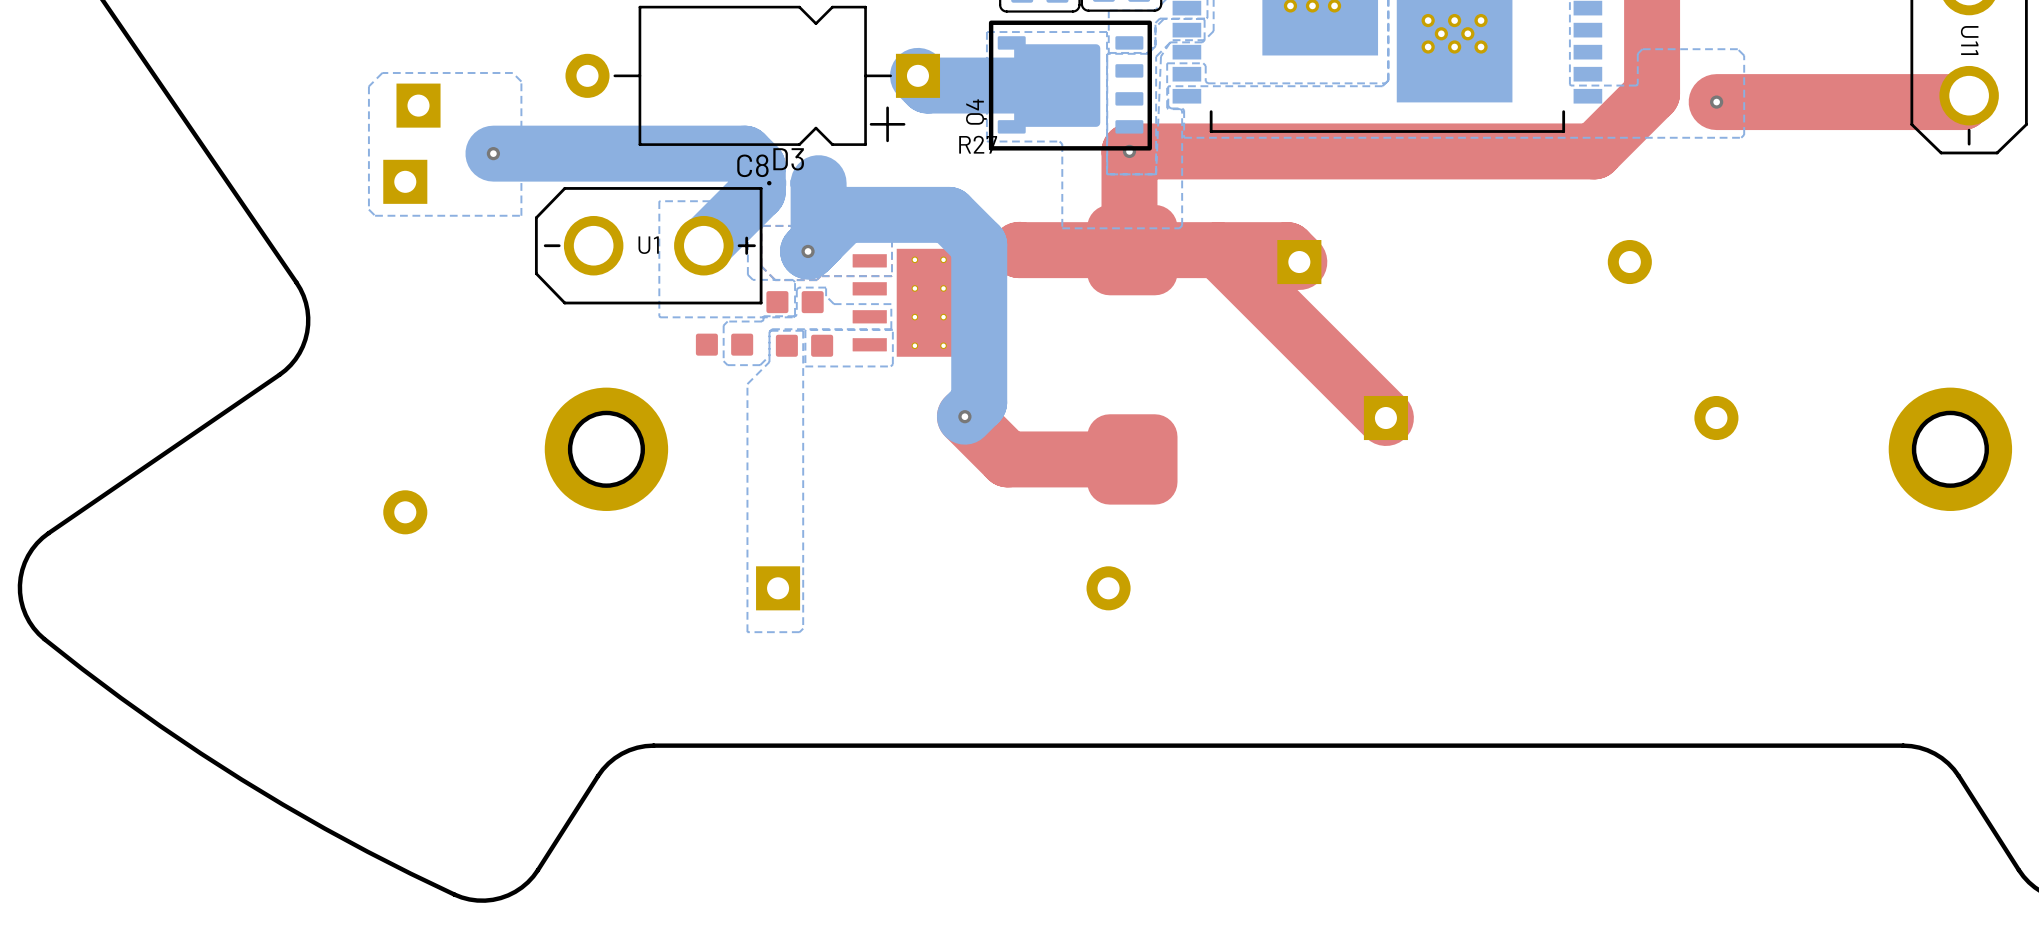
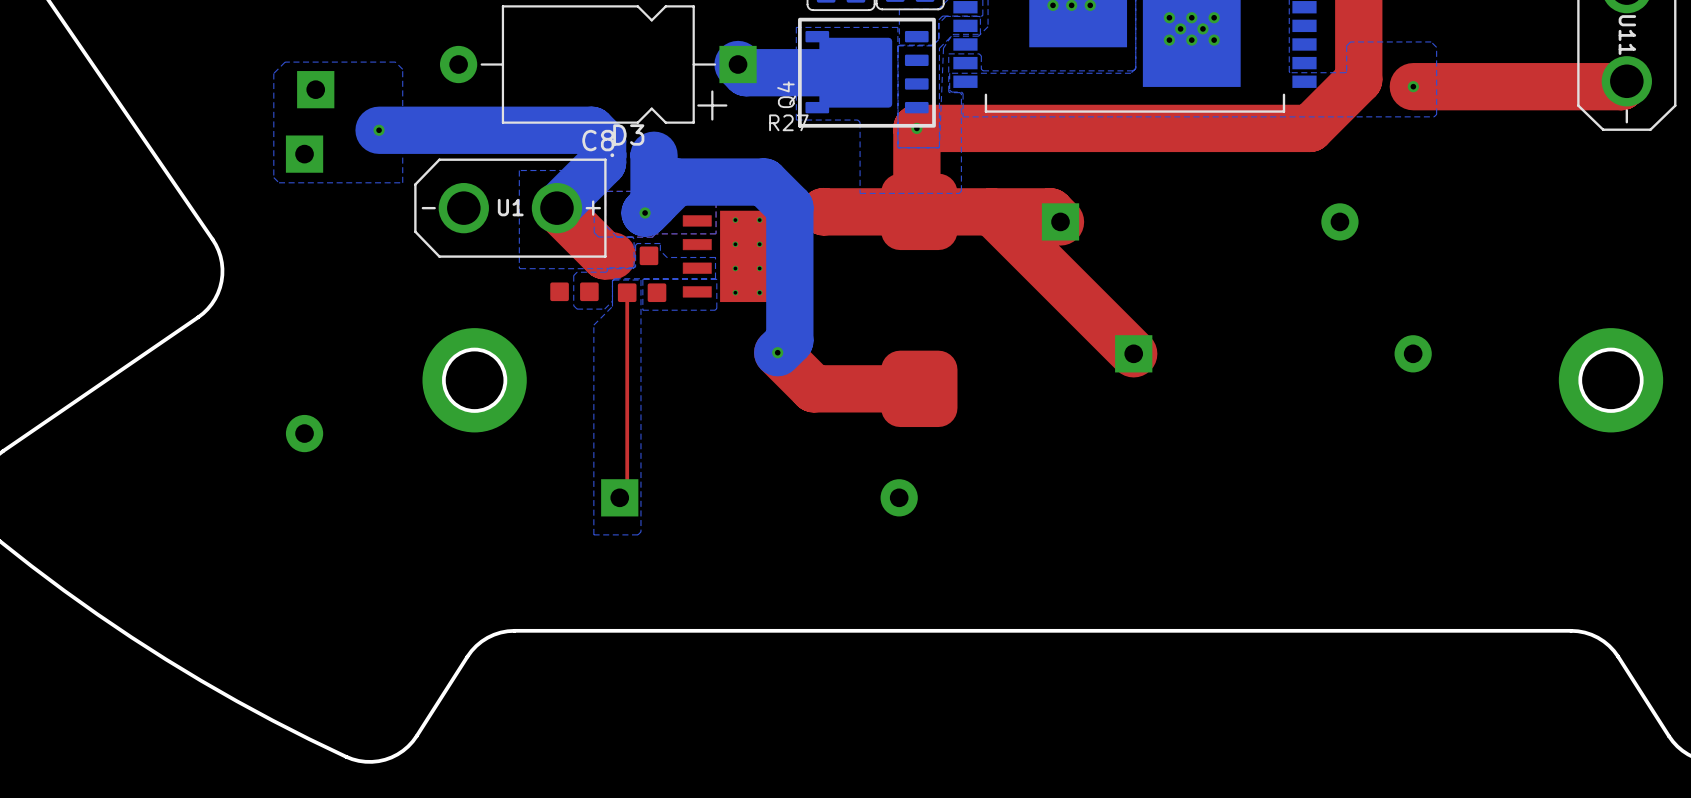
top track: none -> (556, 208) (604, 255) (612, 255)
top track: none -> (627, 292) (627, 490) (619, 497)

